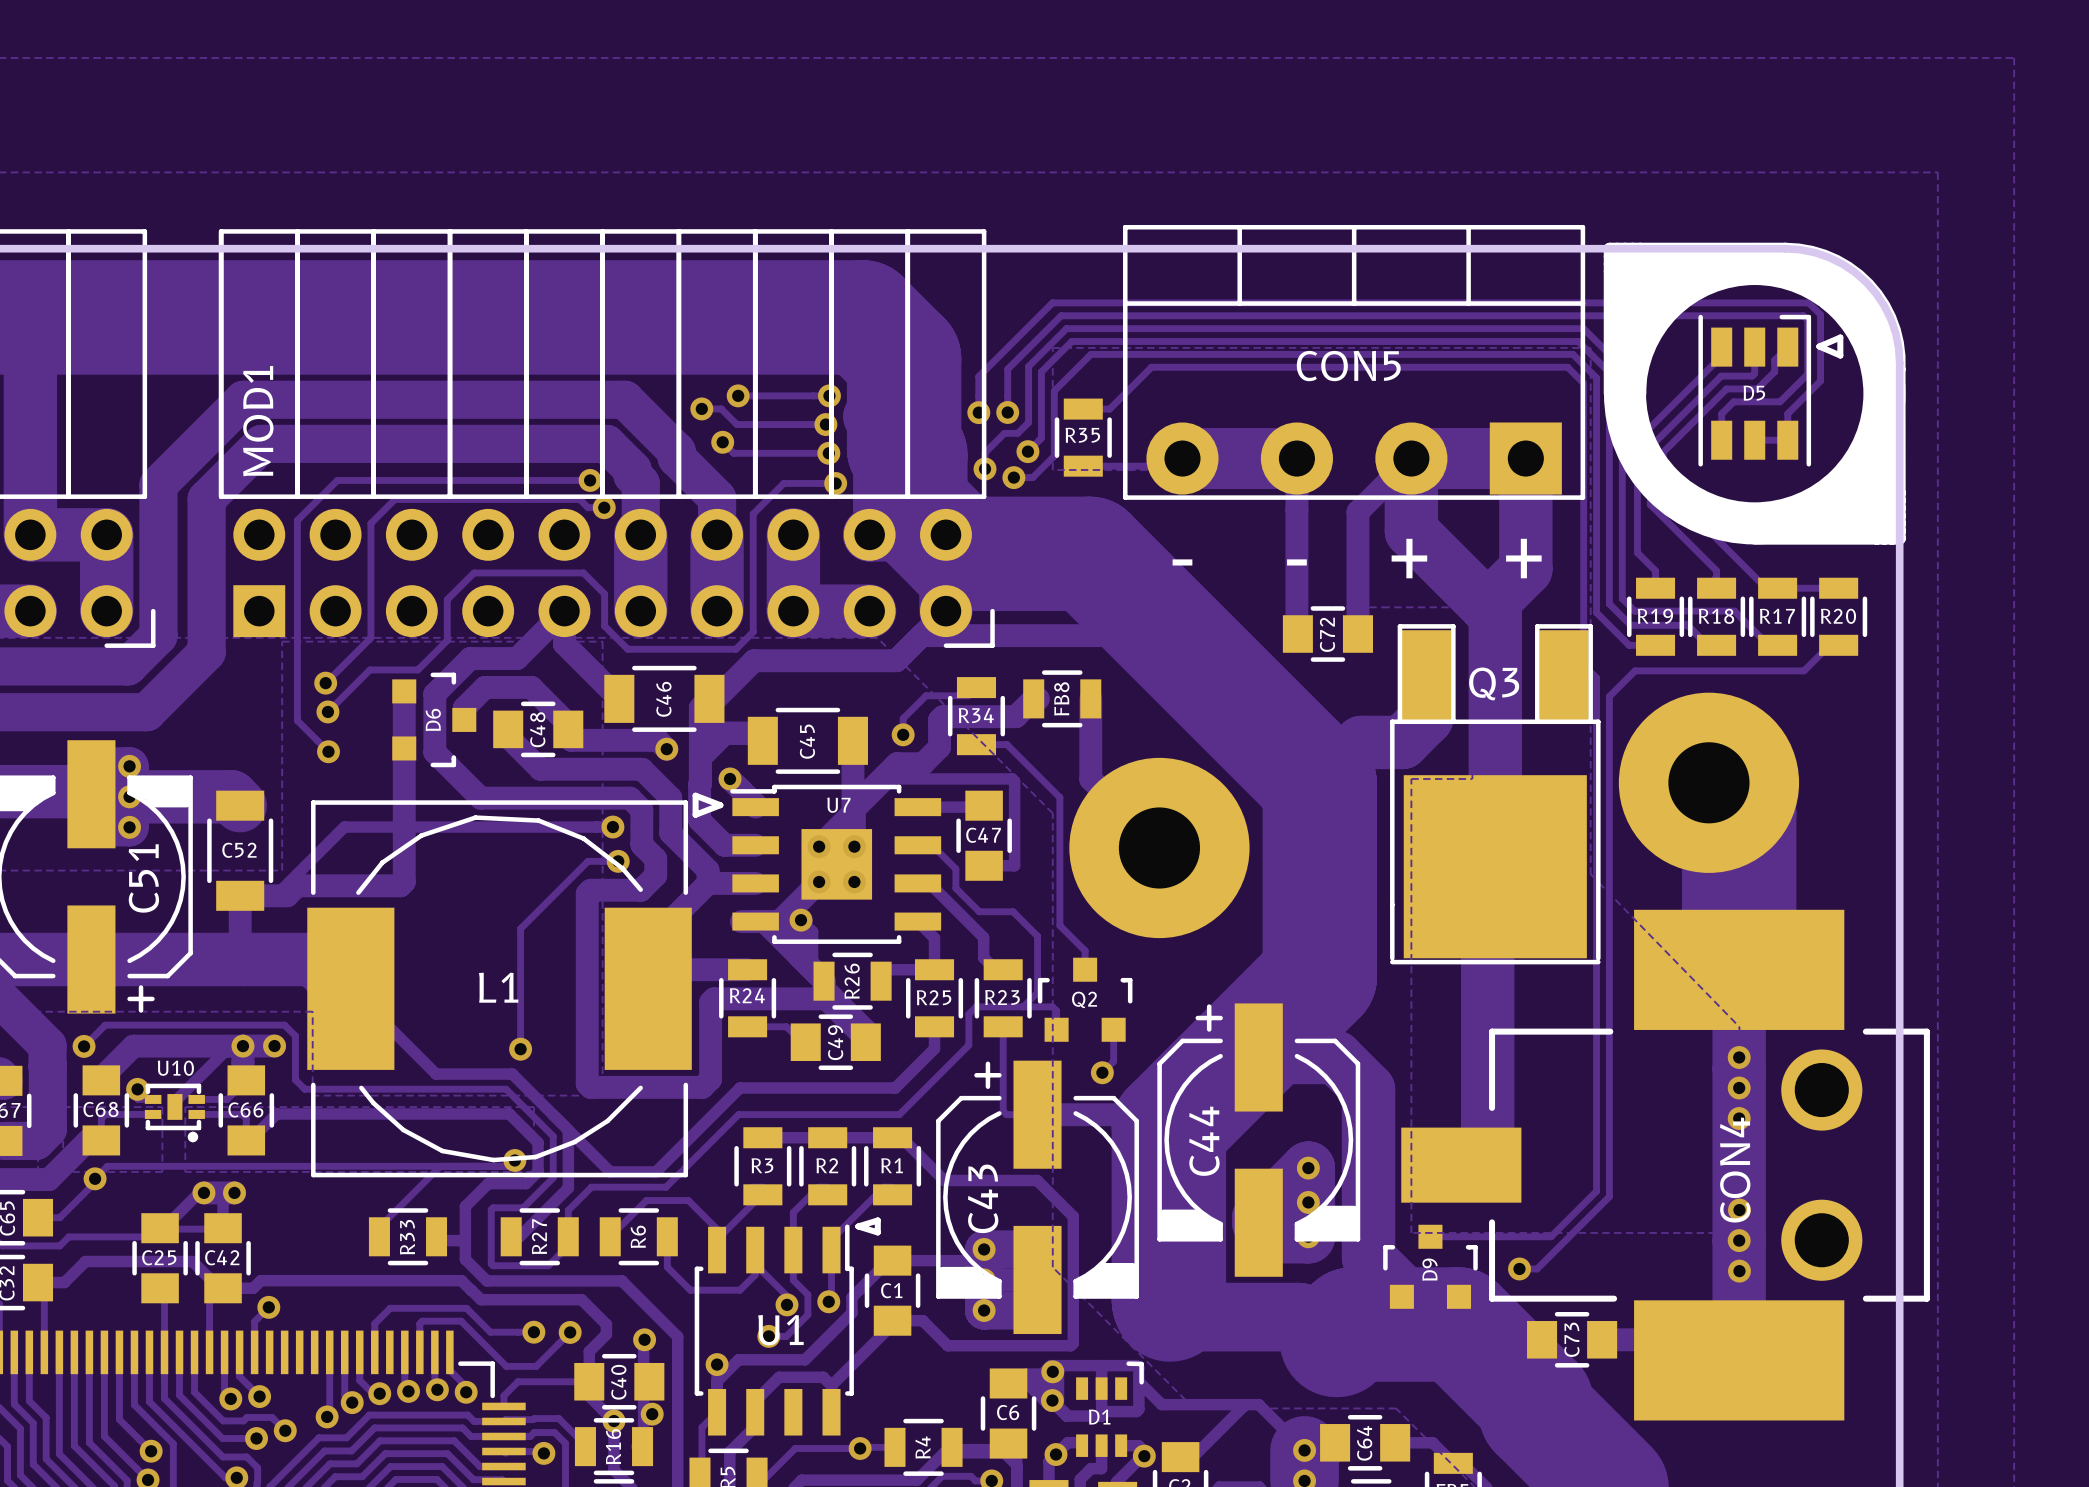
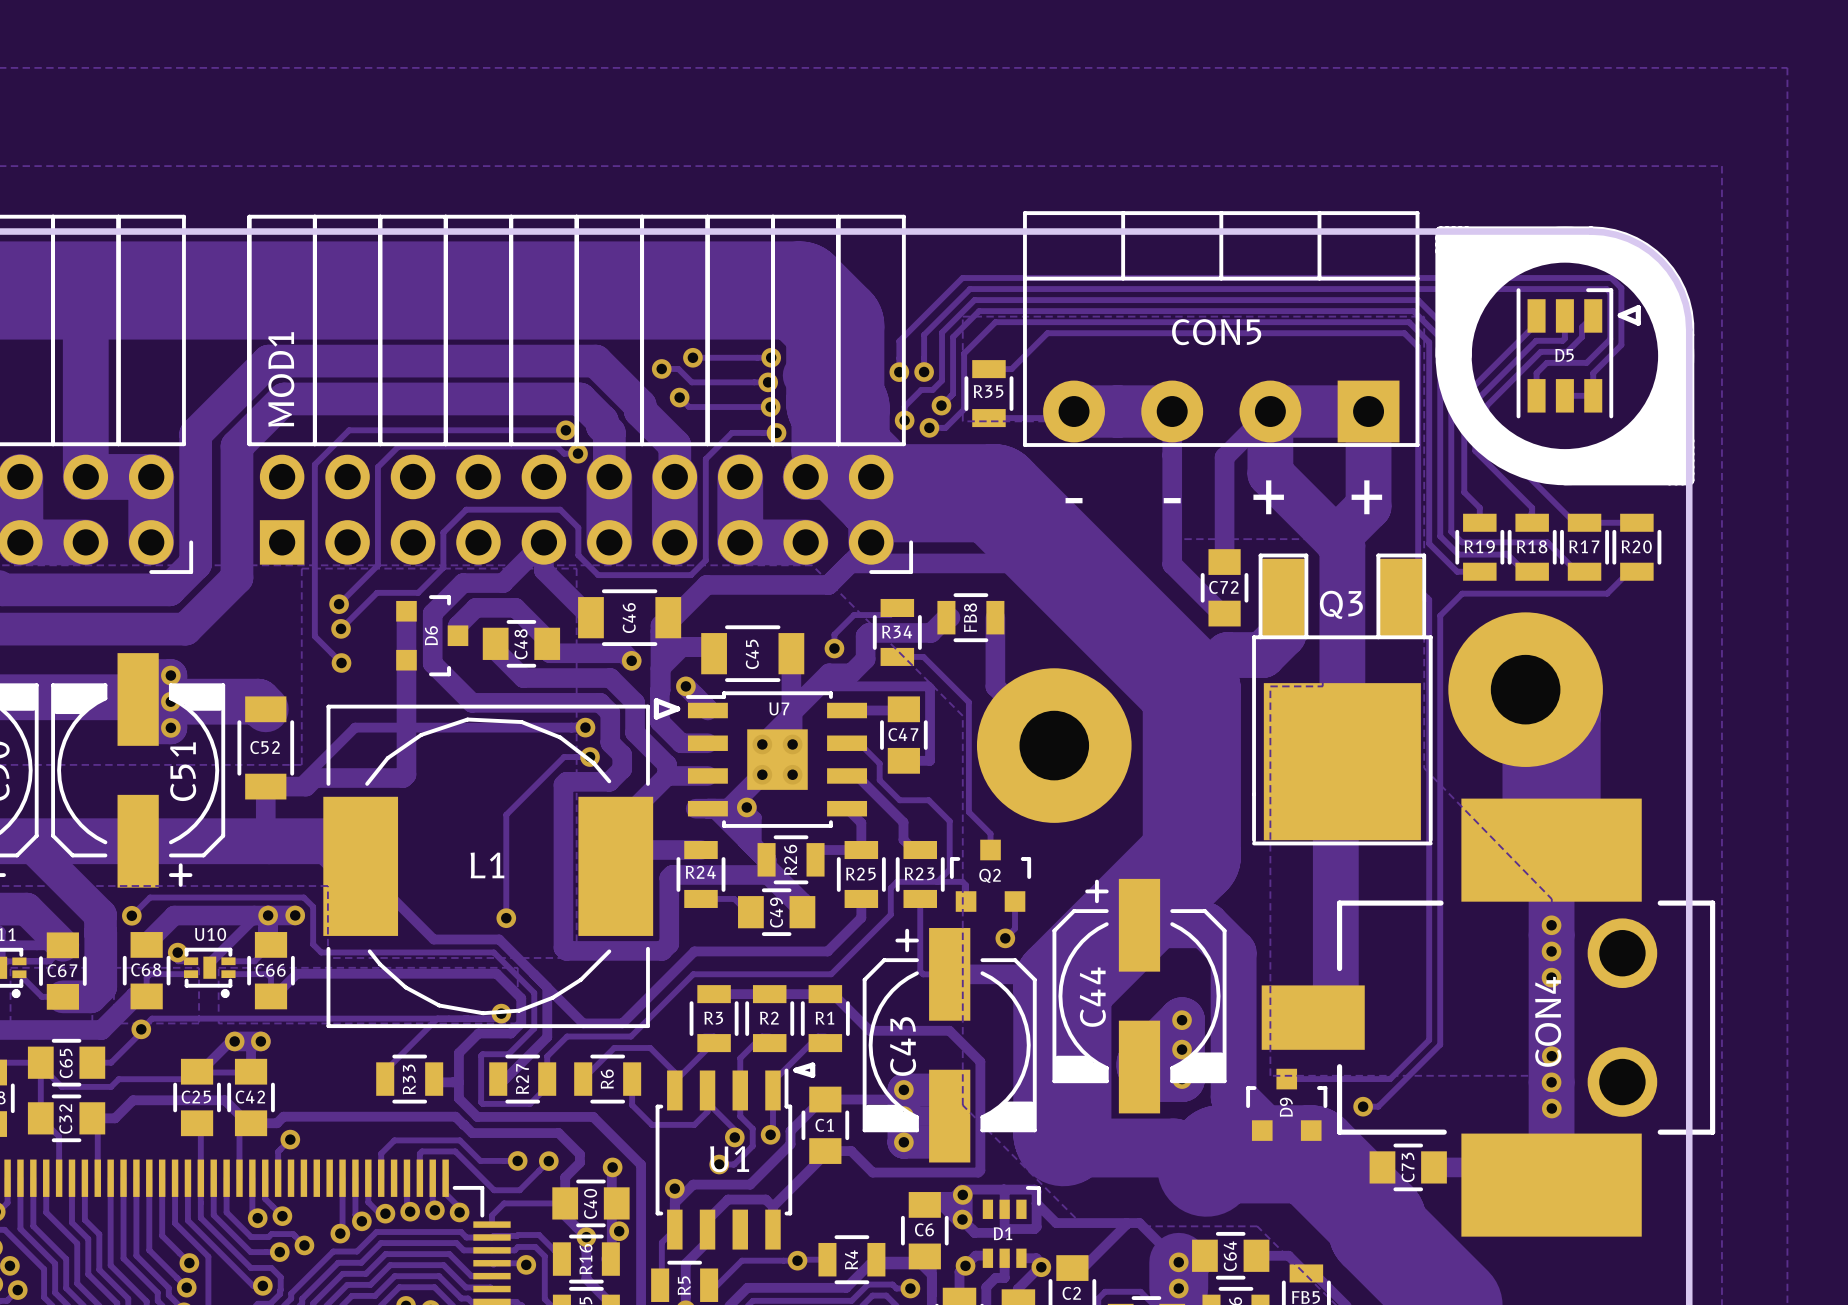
C72 rotation: 0° (1327, 634) -> 90° clockwise (1224, 587)
track: none -> (1172, 564) (1221, 613) (1224, 613)

